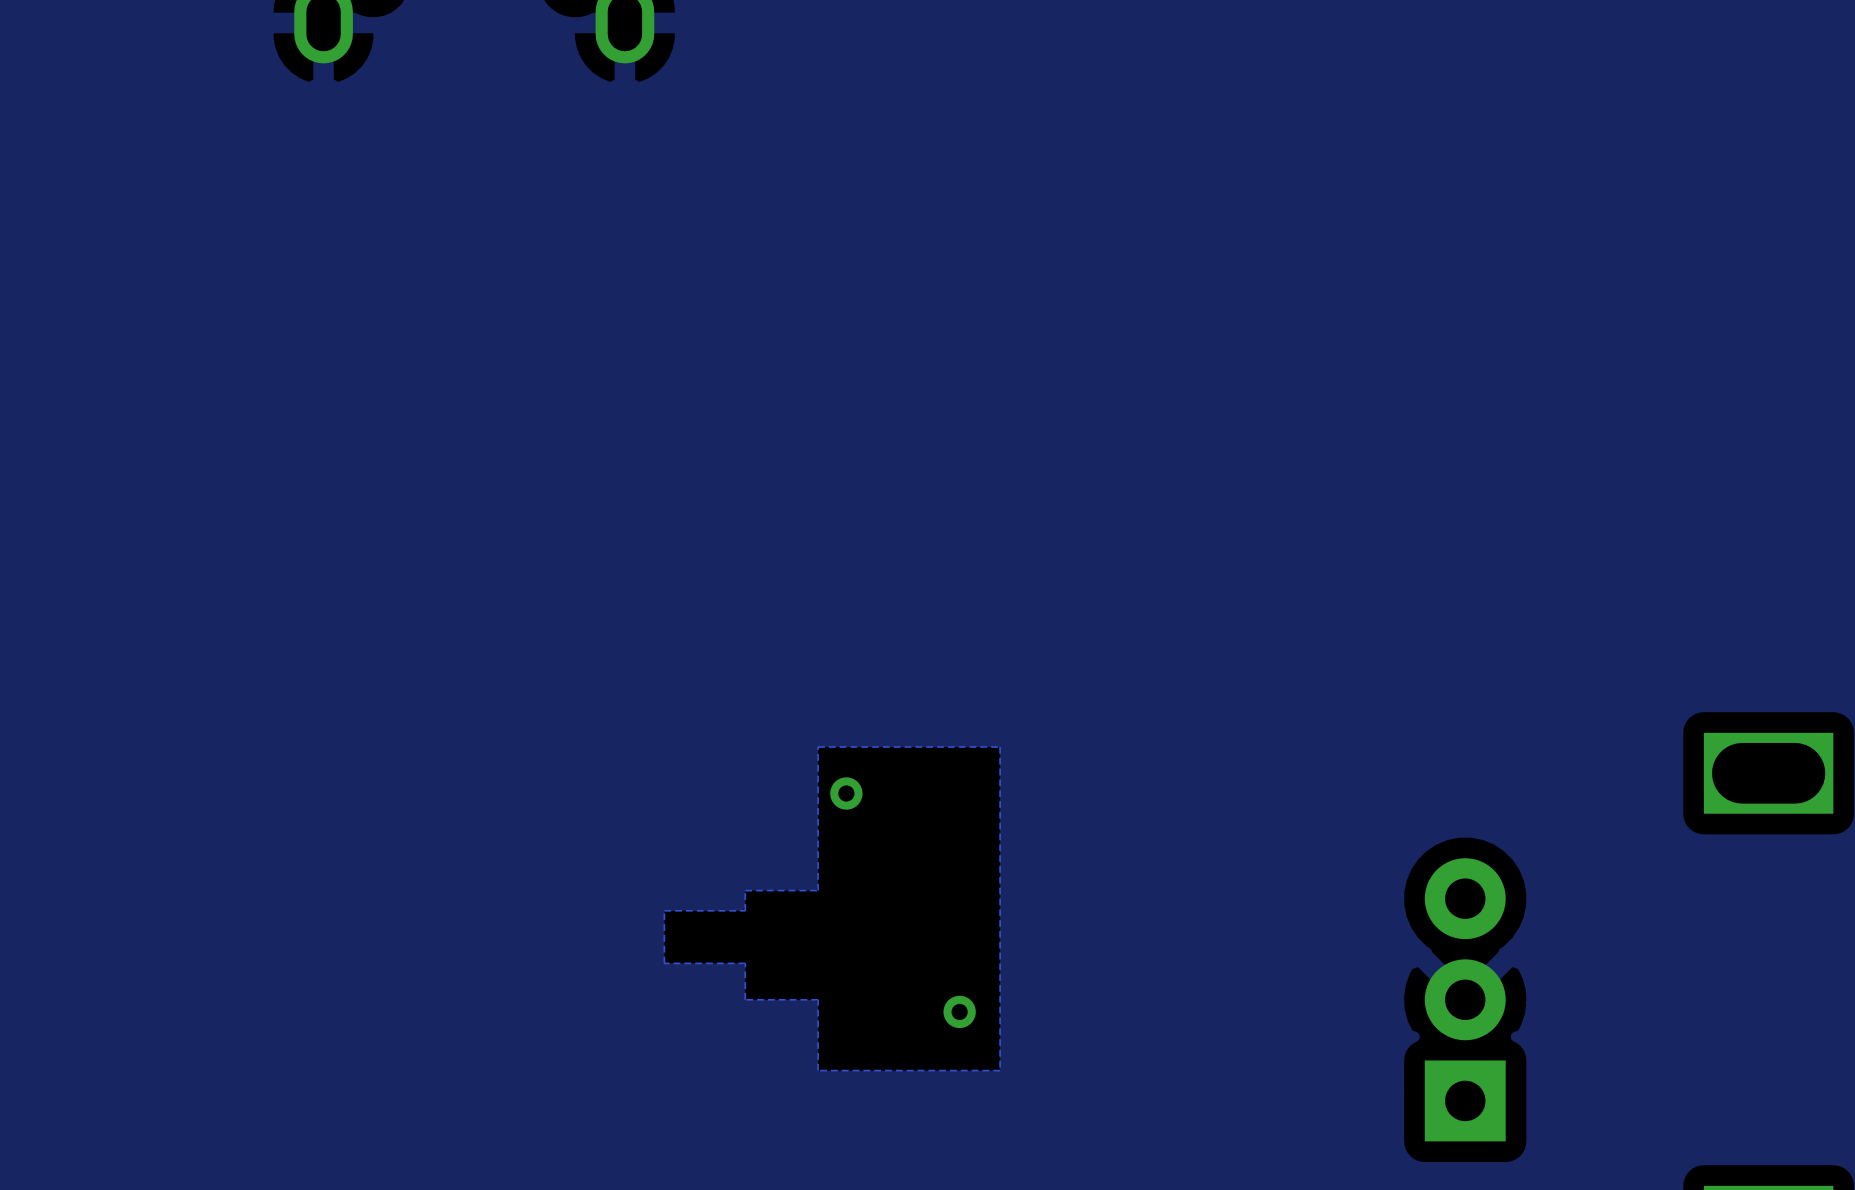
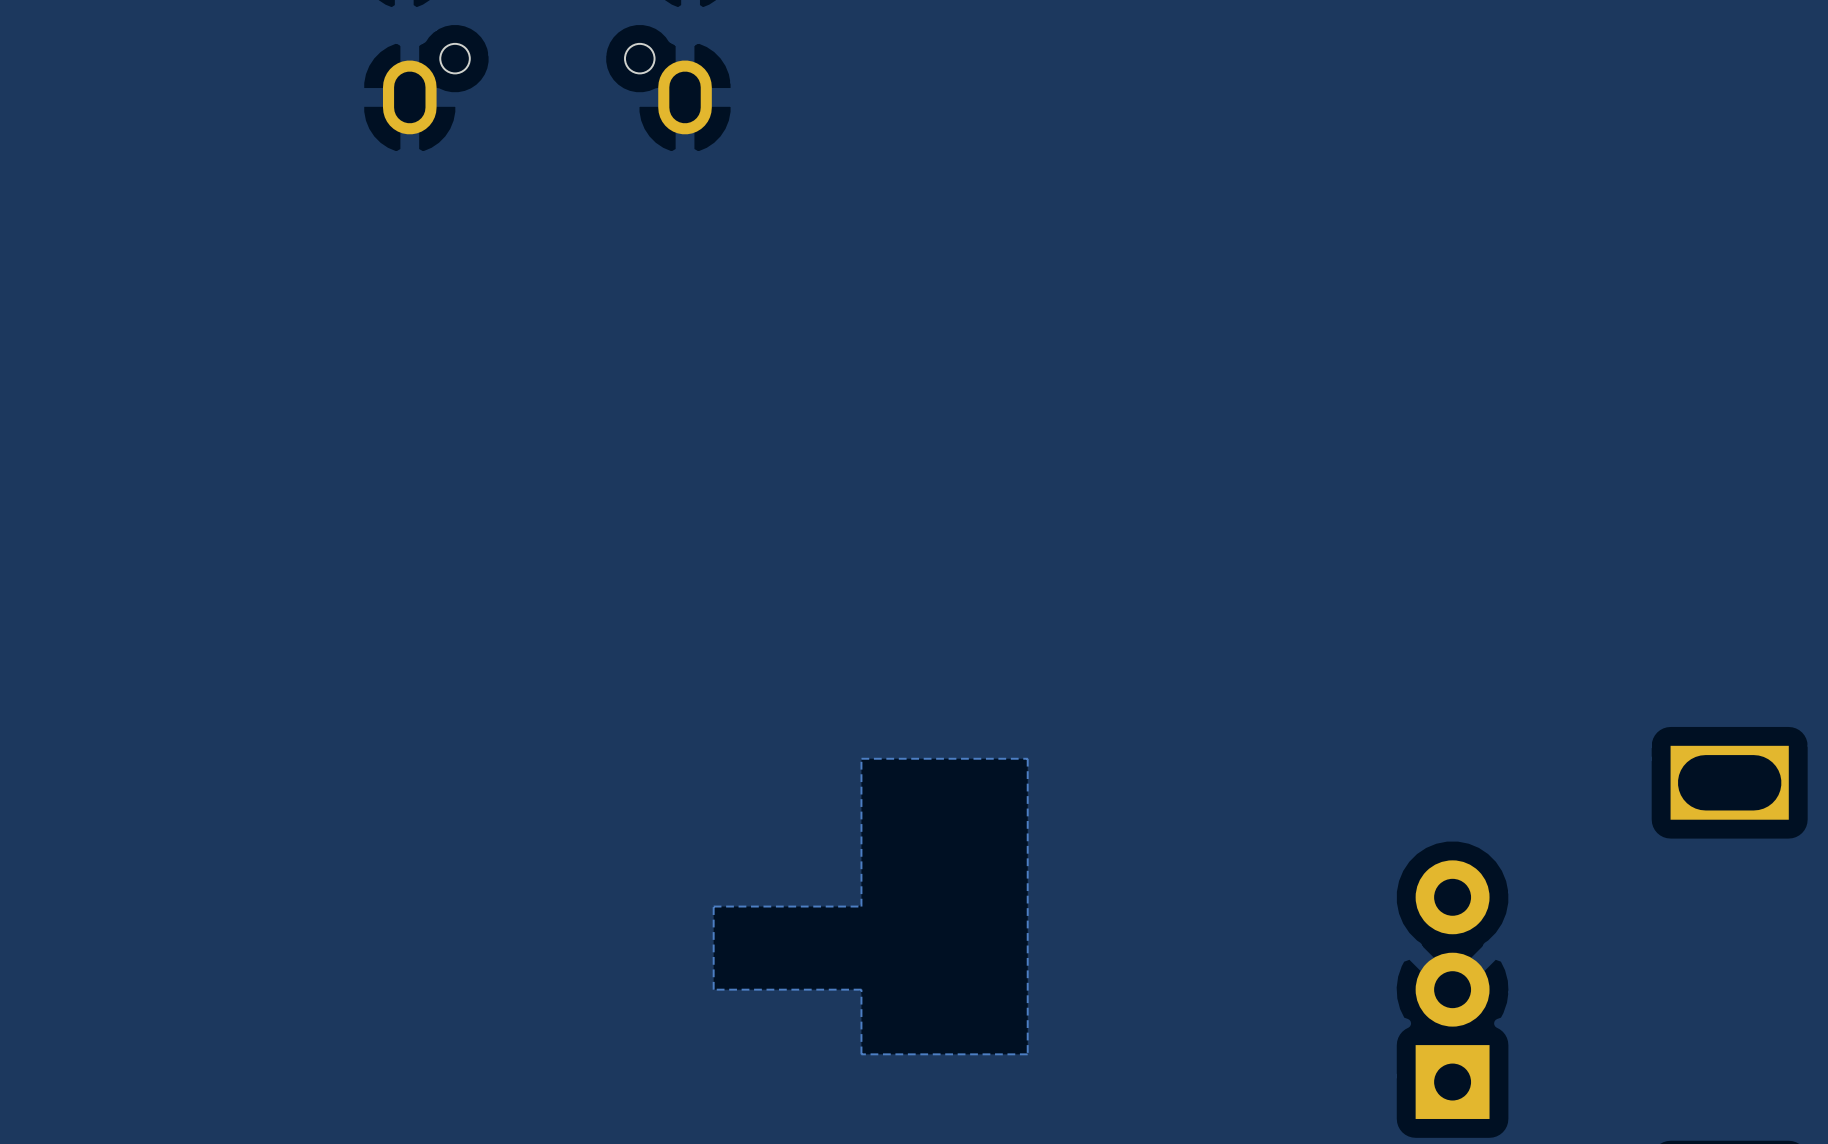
via: (846, 793) -> none
zone outline: (818, 890) (745, 890) (745, 910) (664, 910) (664, 963) (745, 963) (745, 999) -> (861, 889) (861, 906) (713, 906) (713, 989) (794, 989)
via: (959, 1011) -> none

